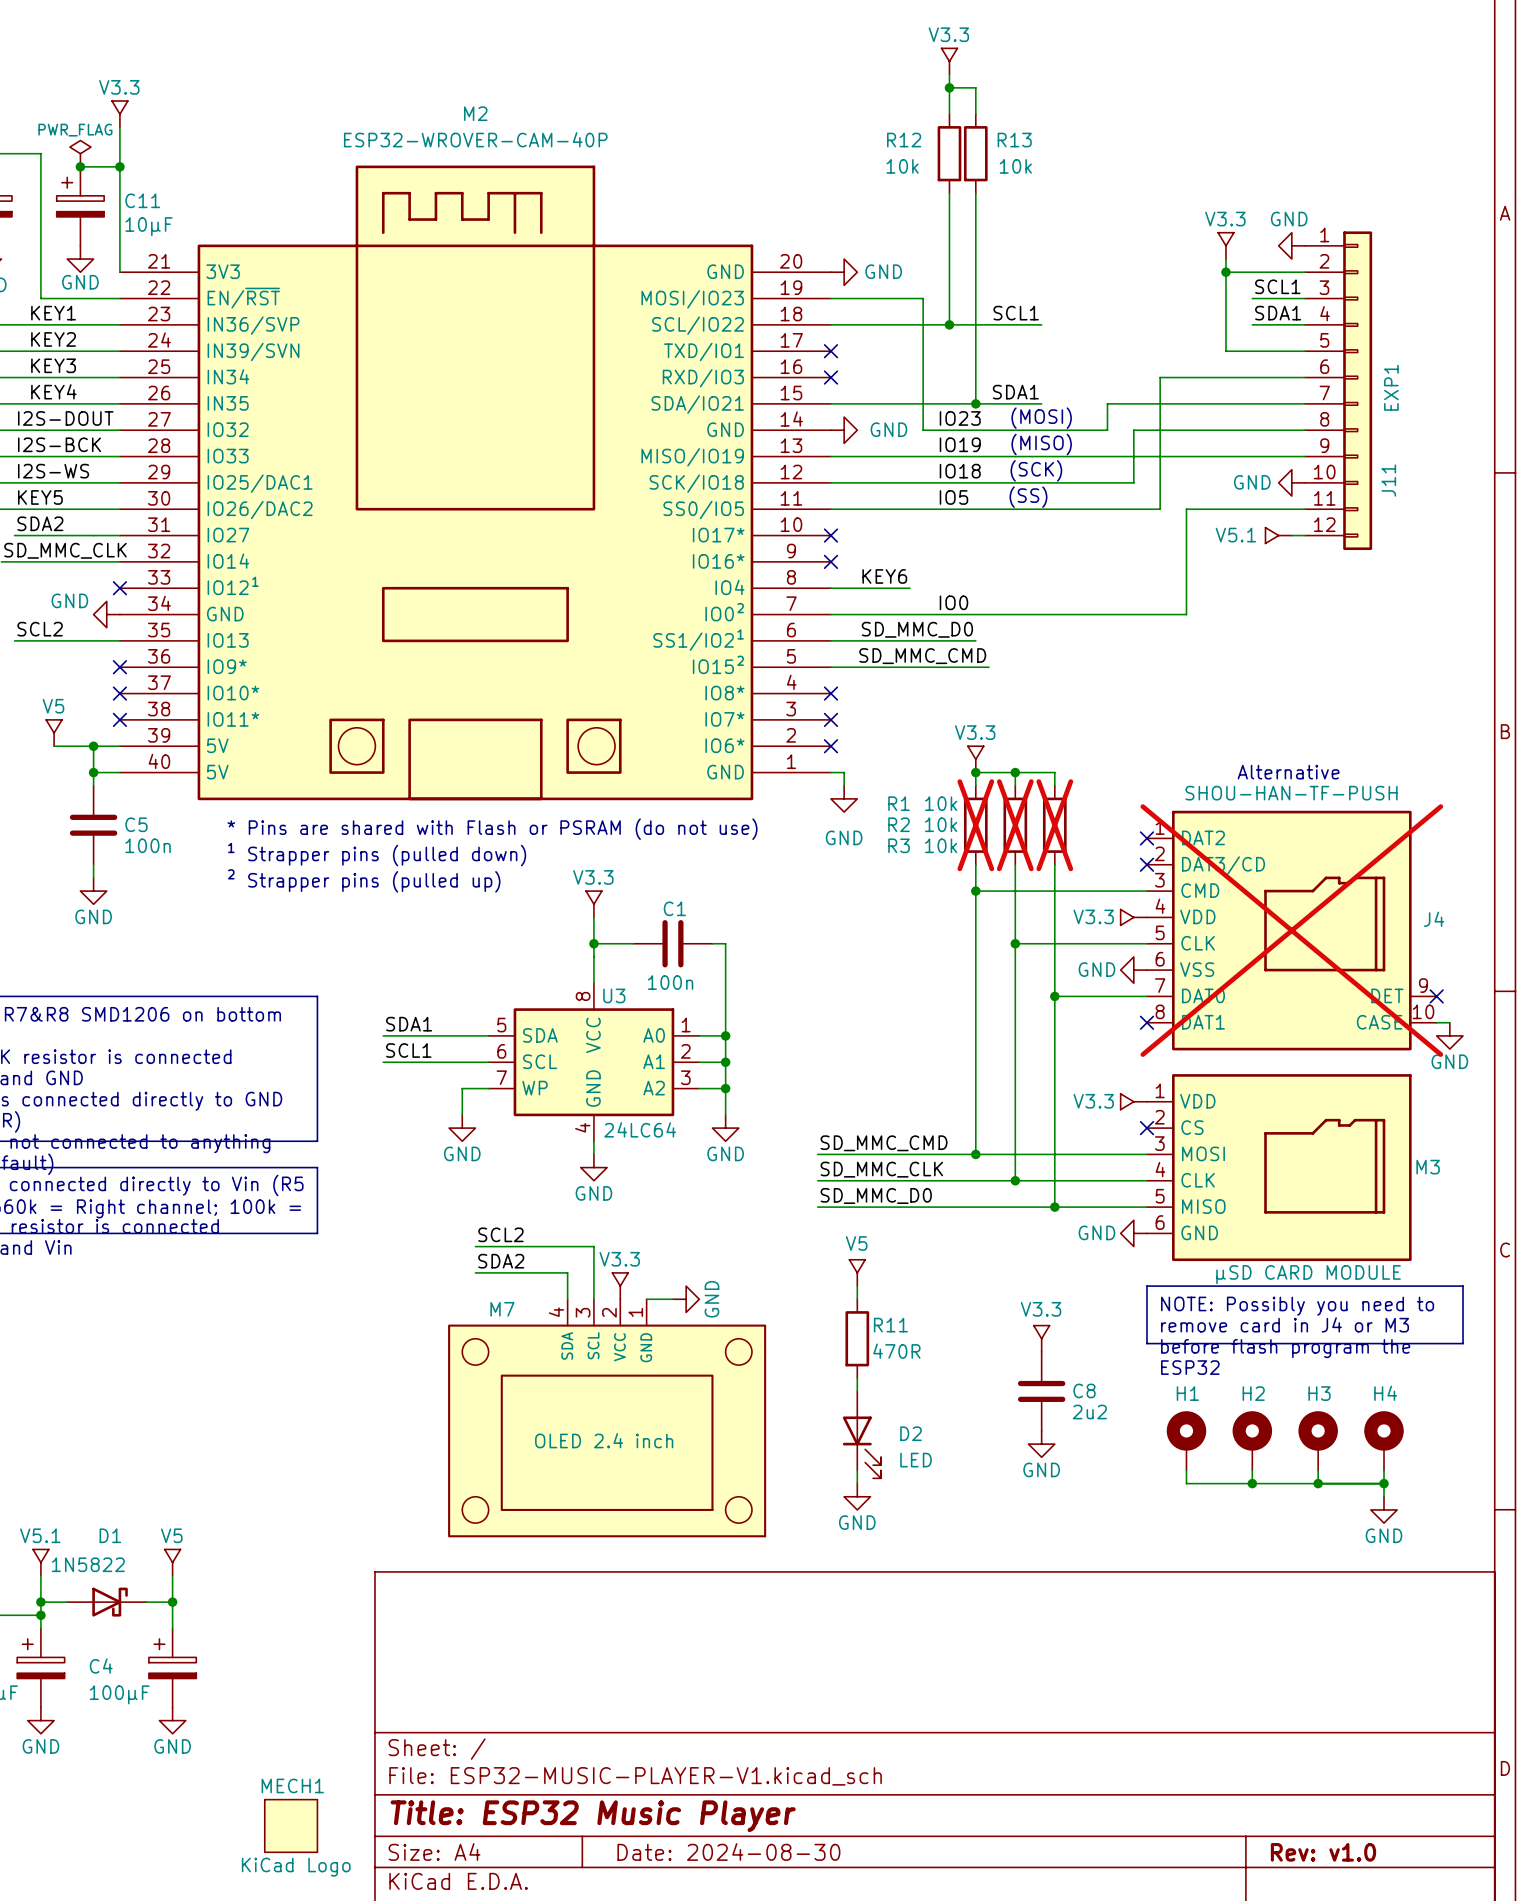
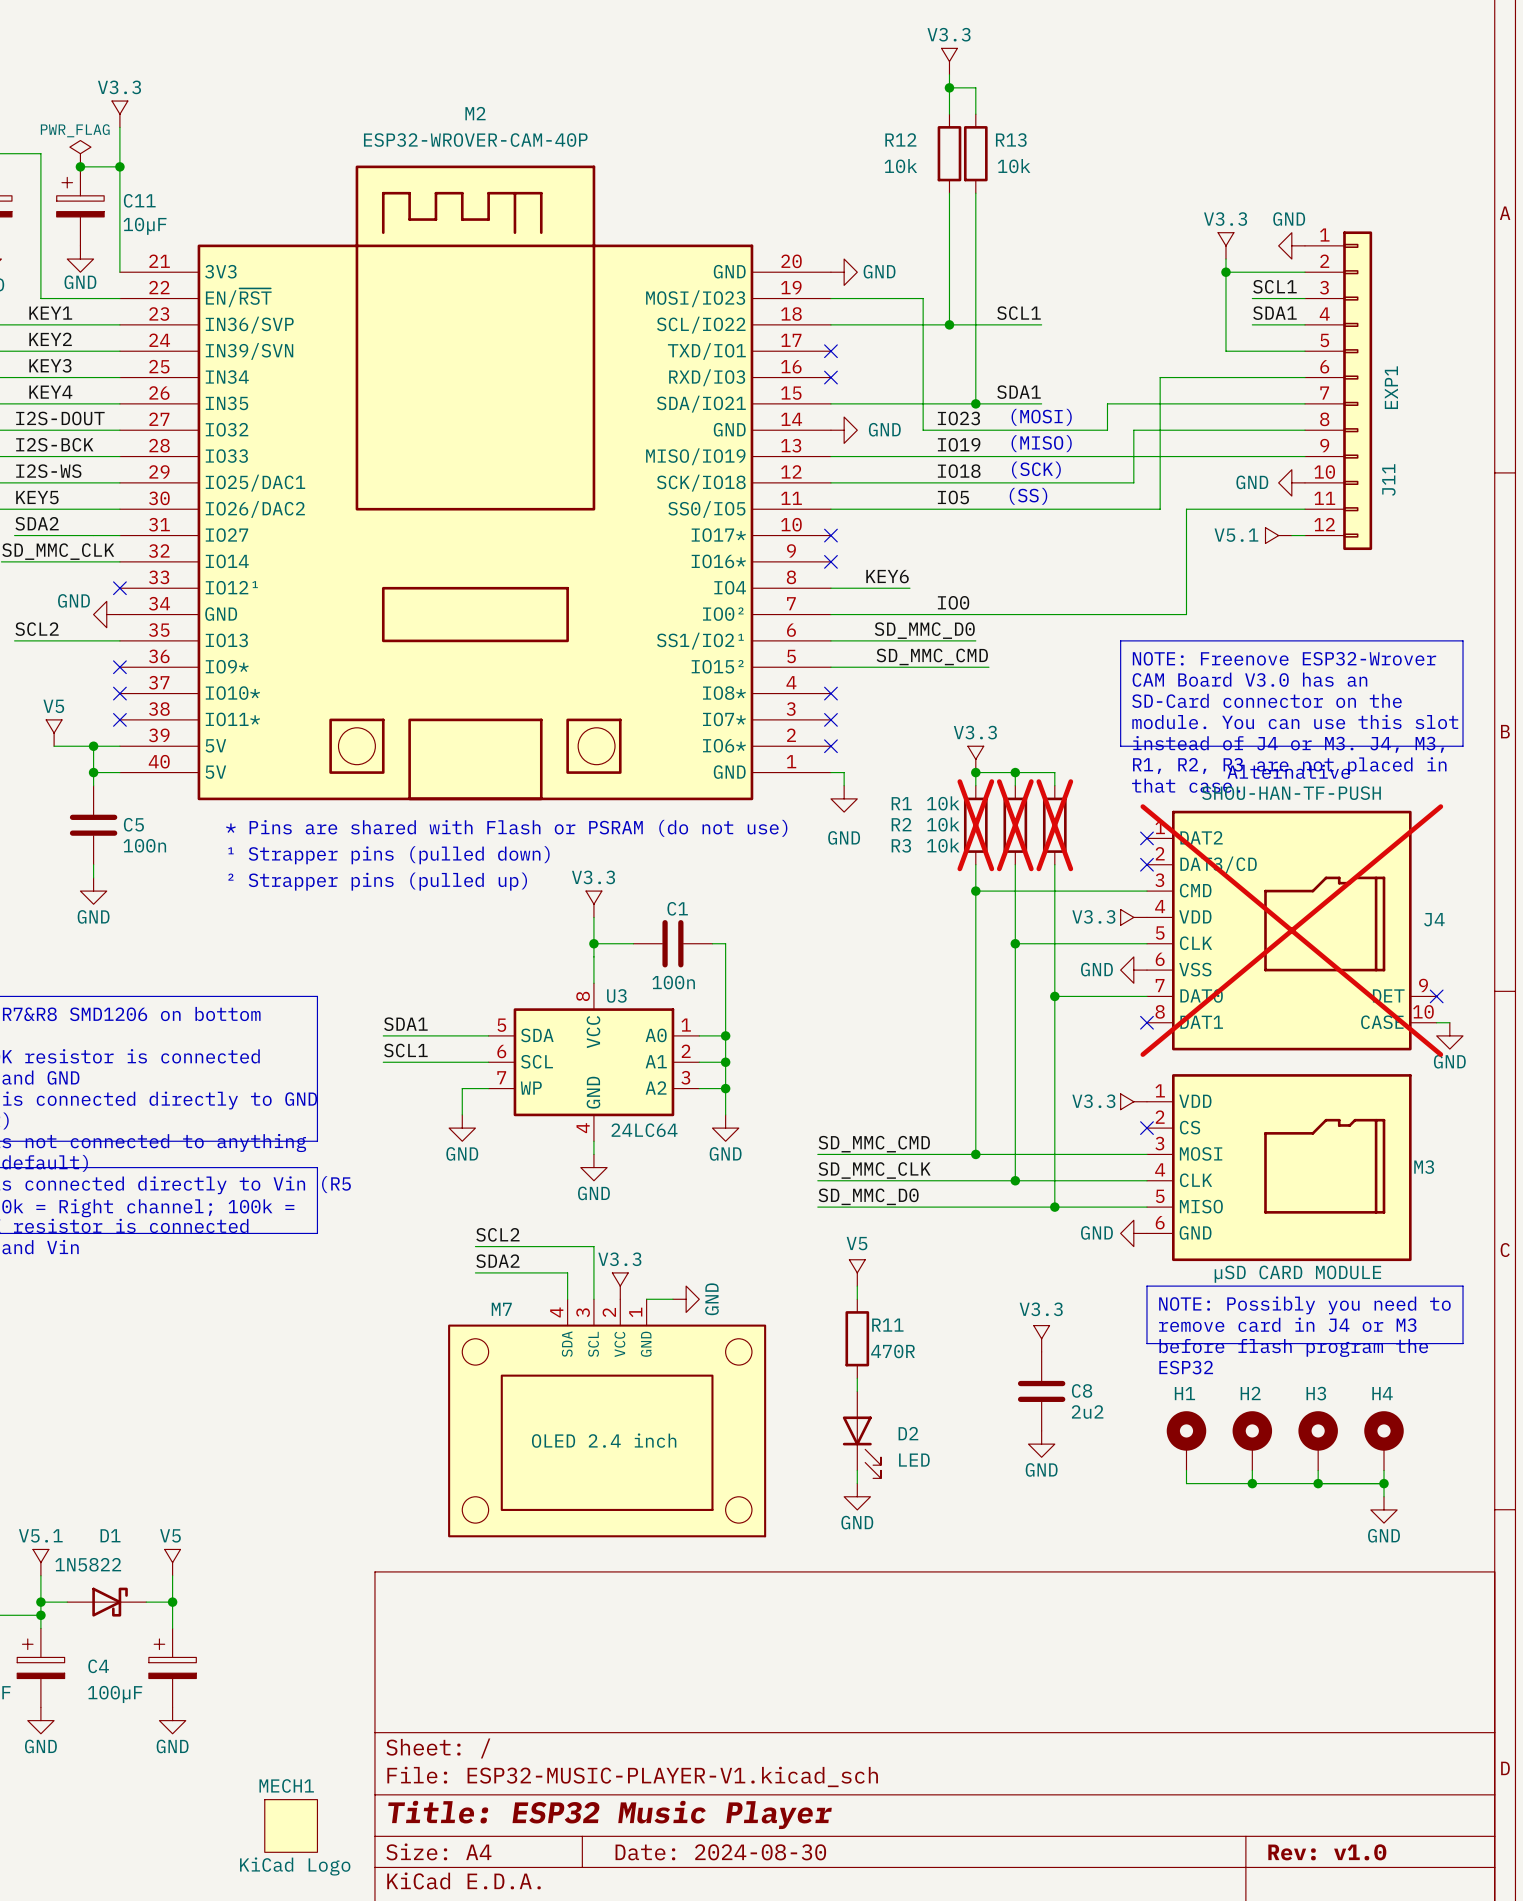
line: none -> (1120, 640) (1463, 640) (1463, 746) (1120, 746) (1120, 640)
text: none -> NOTE: Freenove ESP32-Wrover (1284, 658)
text: none -> CAM Board V3.0 has an (1249, 679)
text: none -> SD-Card connector on the (1266, 700)
text: none -> module. You can use this slot (1295, 722)
text: none -> instead of J4 or M3. J4, M3, (1288, 744)
text: none -> R1, R2, R3 are not placed in (1289, 766)
text: none -> that case. (1186, 785)

